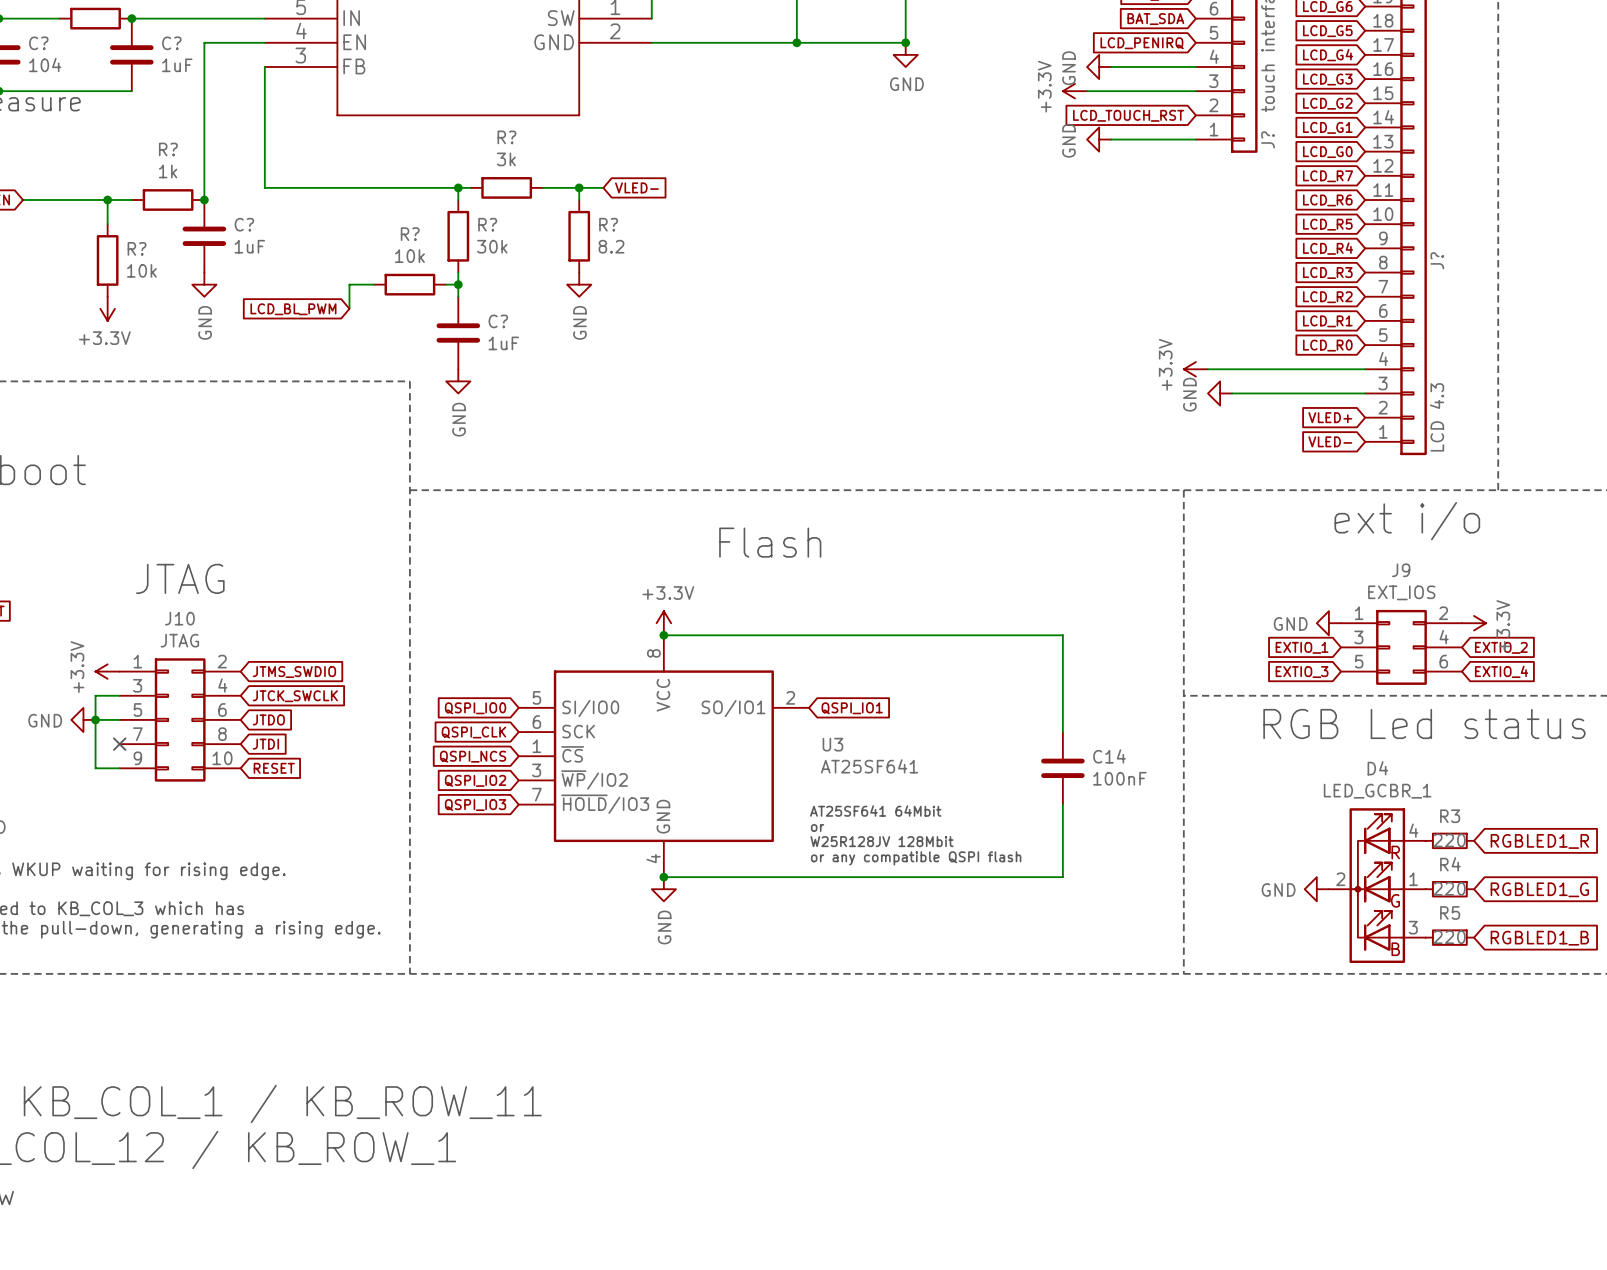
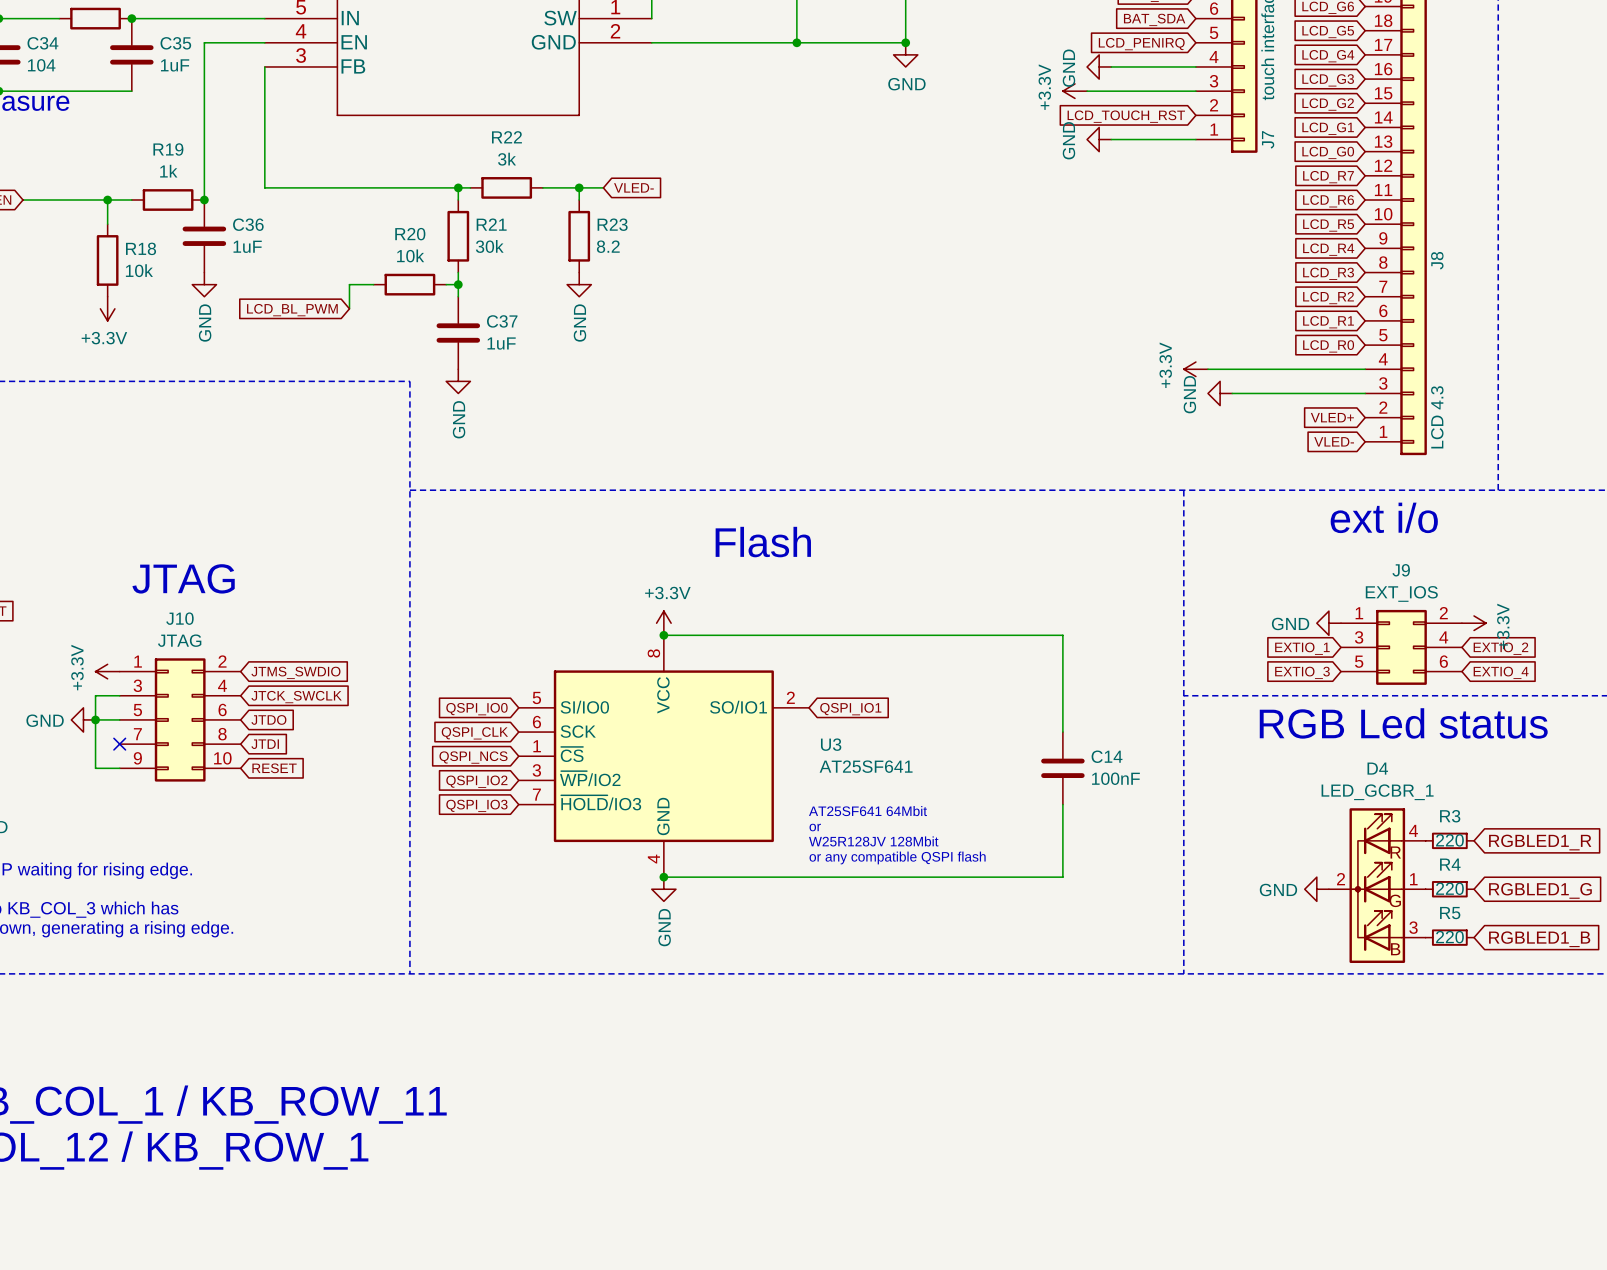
C? name: C? (38, 43) -> C34 (42, 43)
C? name: C? (171, 43) -> C35 (175, 43)
R? name: R? (506, 137) -> R22 (506, 137)
J? name: J? (1268, 139) -> J7 (1268, 139)
R? name: R? (168, 149) -> R19 (168, 149)
C? name: C? (244, 224) -> C36 (248, 224)
R? name: R? (487, 224) -> R21 (491, 224)
R? name: R? (608, 224) -> R23 (612, 224)
R? name: R? (410, 234) -> R20 (410, 234)
R? name: R? (137, 248) -> R18 (141, 248)
J? name: J? (1437, 260) -> J8 (1437, 260)
C? name: C? (498, 321) -> C37 (502, 321)

